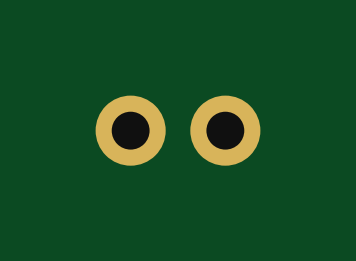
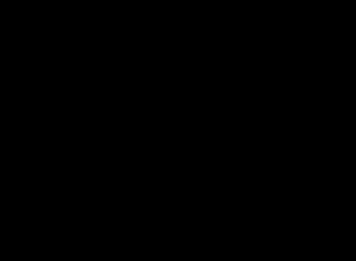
part: (178, 130) -> none

